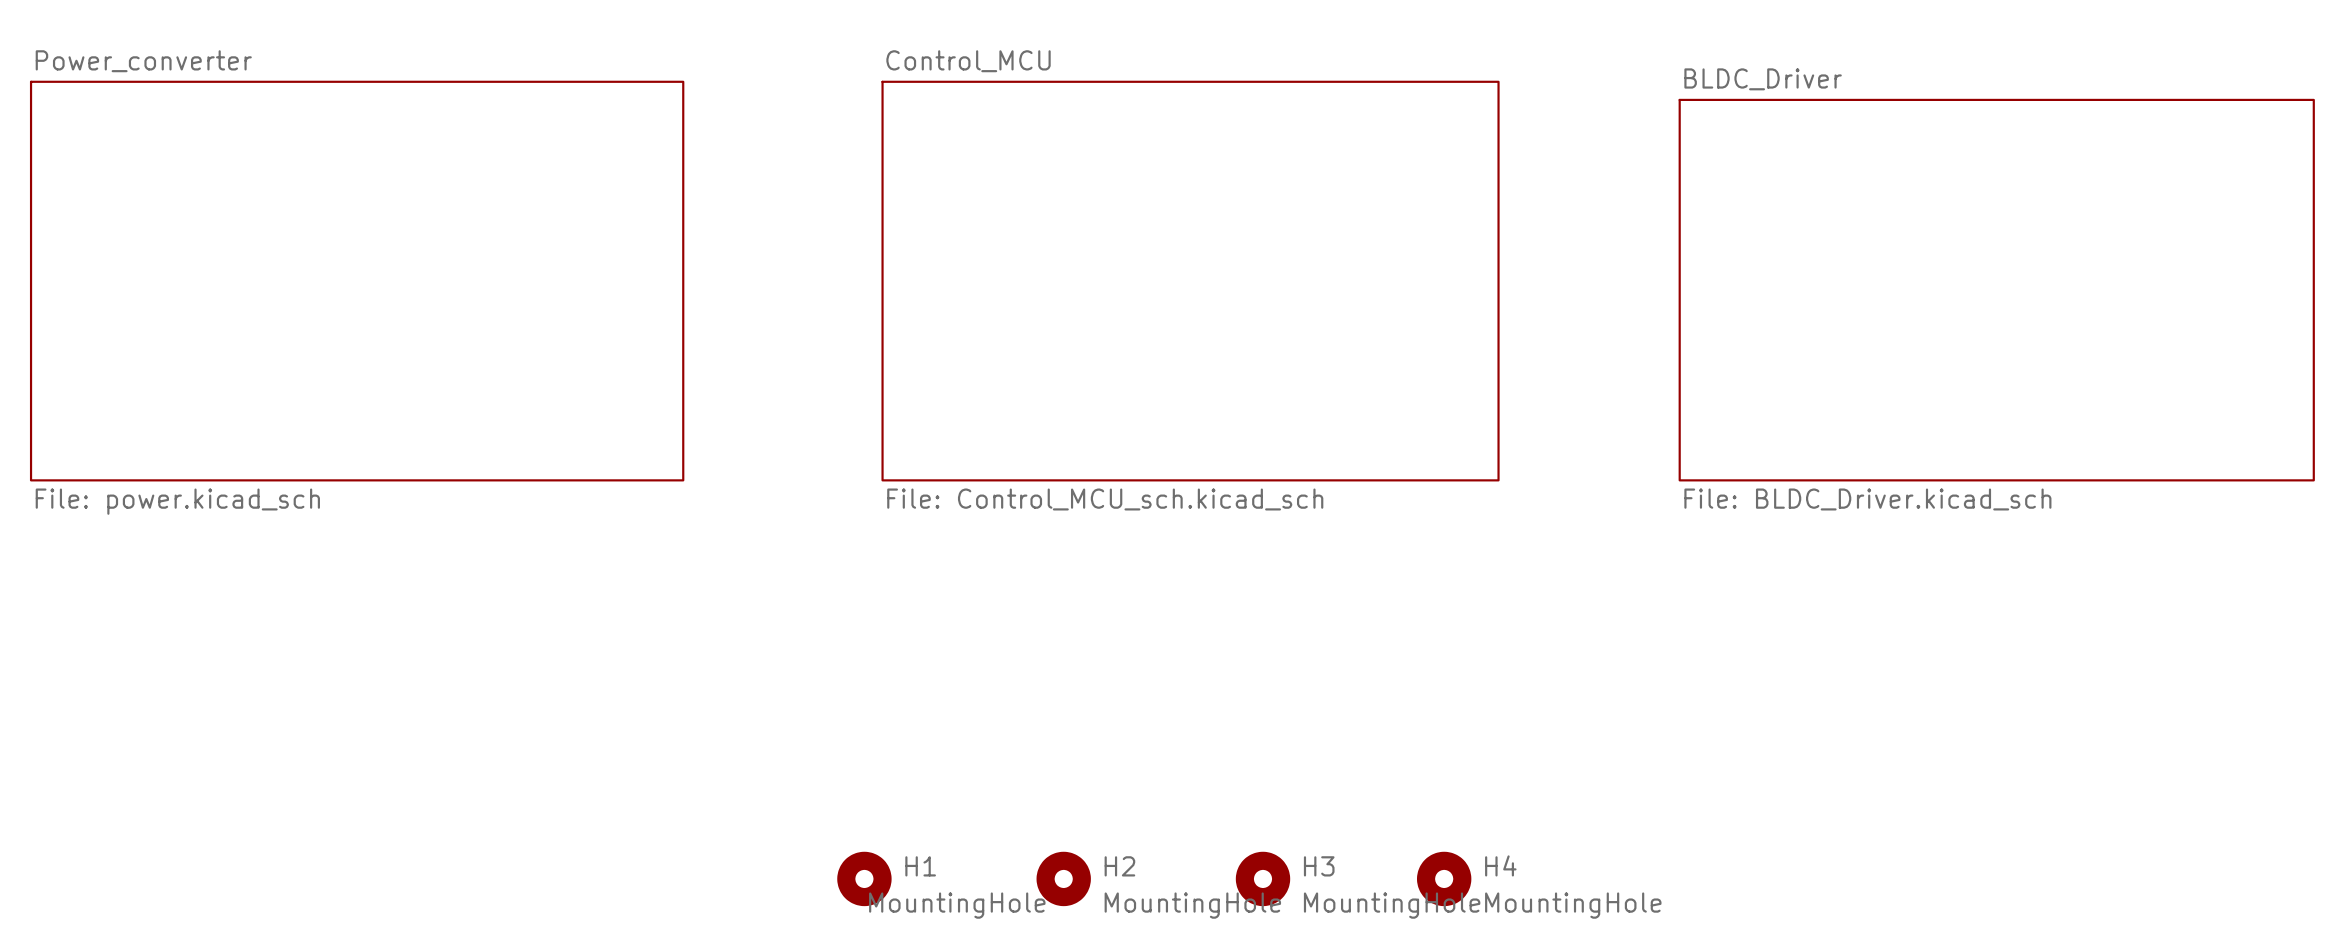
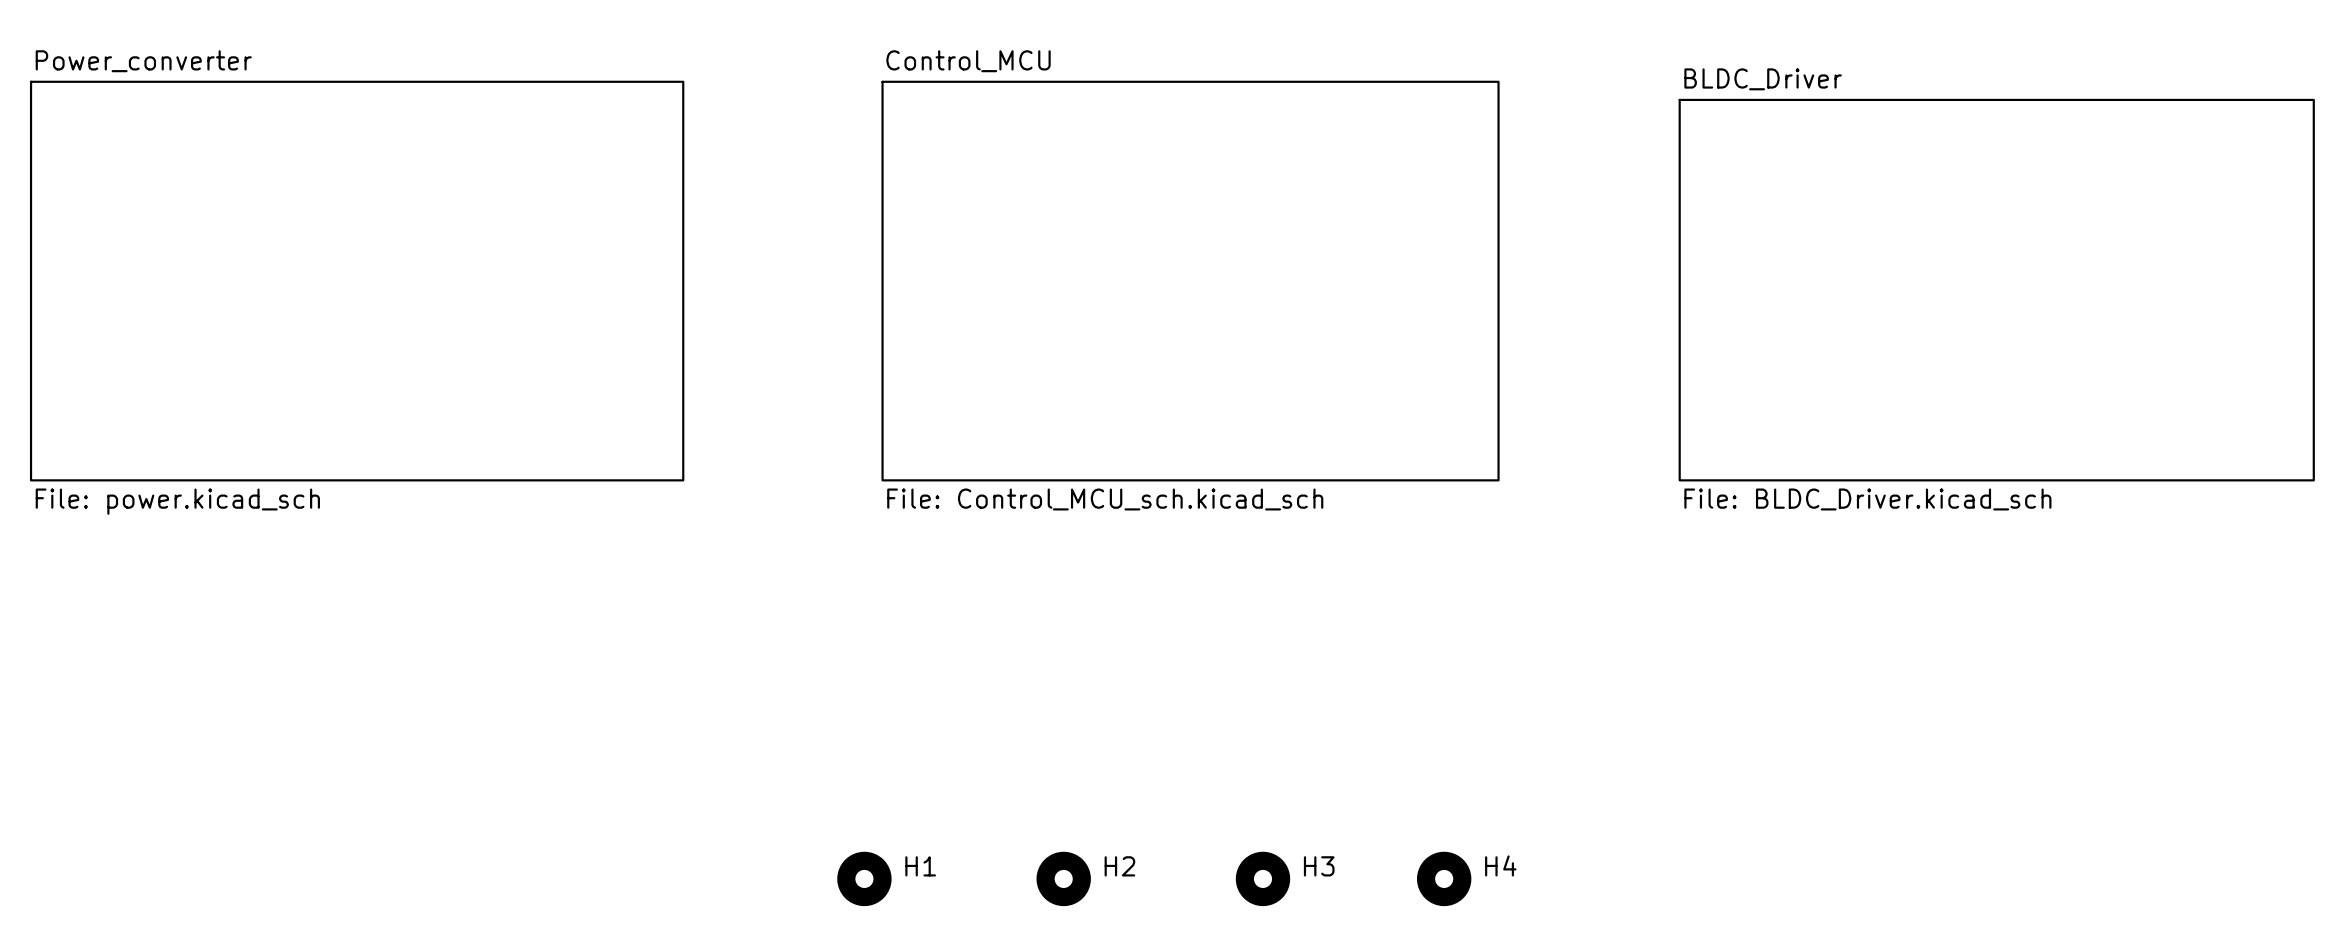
H1 value: MountingHole (957, 905) -> none
H2 value: MountingHole (1192, 905) -> none
H3 value: MountingHole (1392, 905) -> none
H4 value: MountingHole (1573, 905) -> none

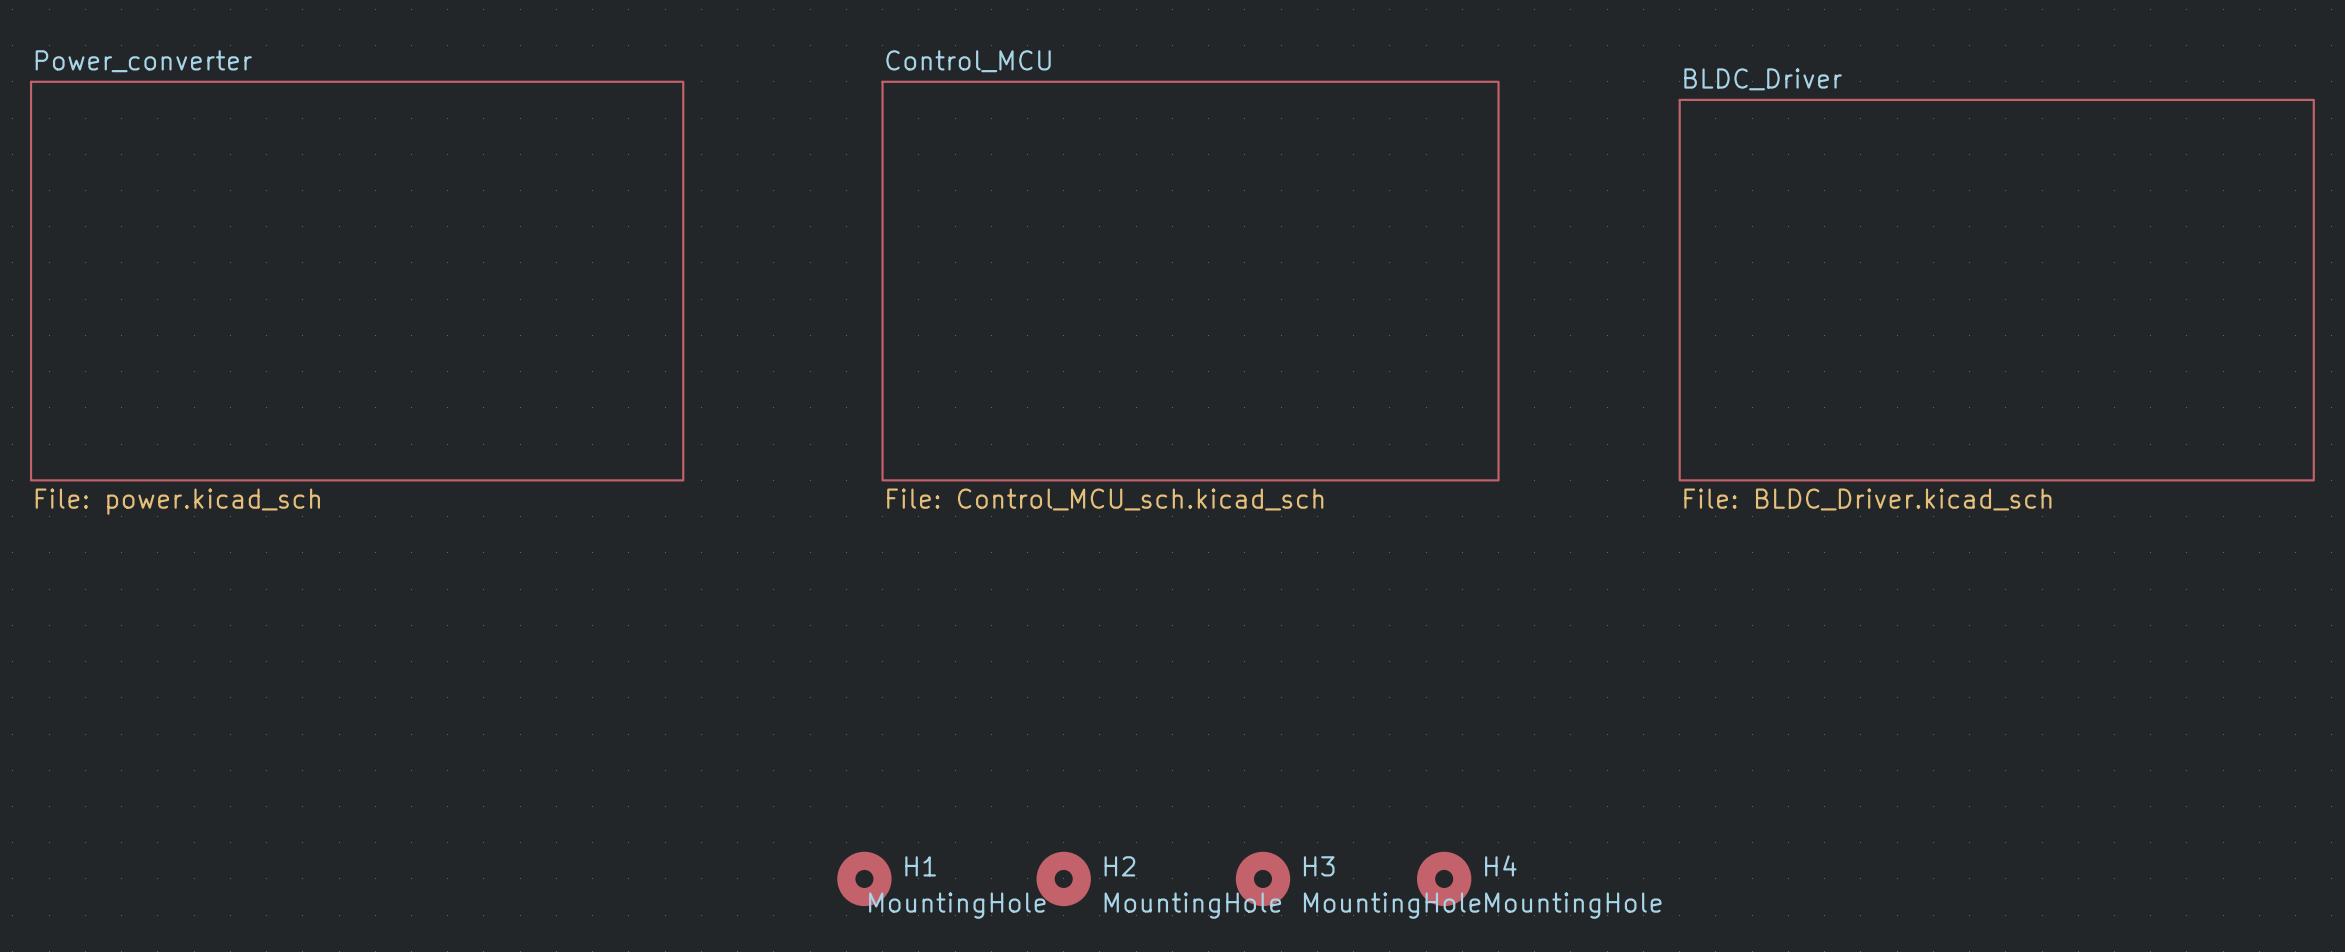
H1 value: none -> MountingHole (957, 905)
H2 value: none -> MountingHole (1192, 905)
H3 value: none -> MountingHole (1392, 905)
H4 value: none -> MountingHole (1573, 905)

